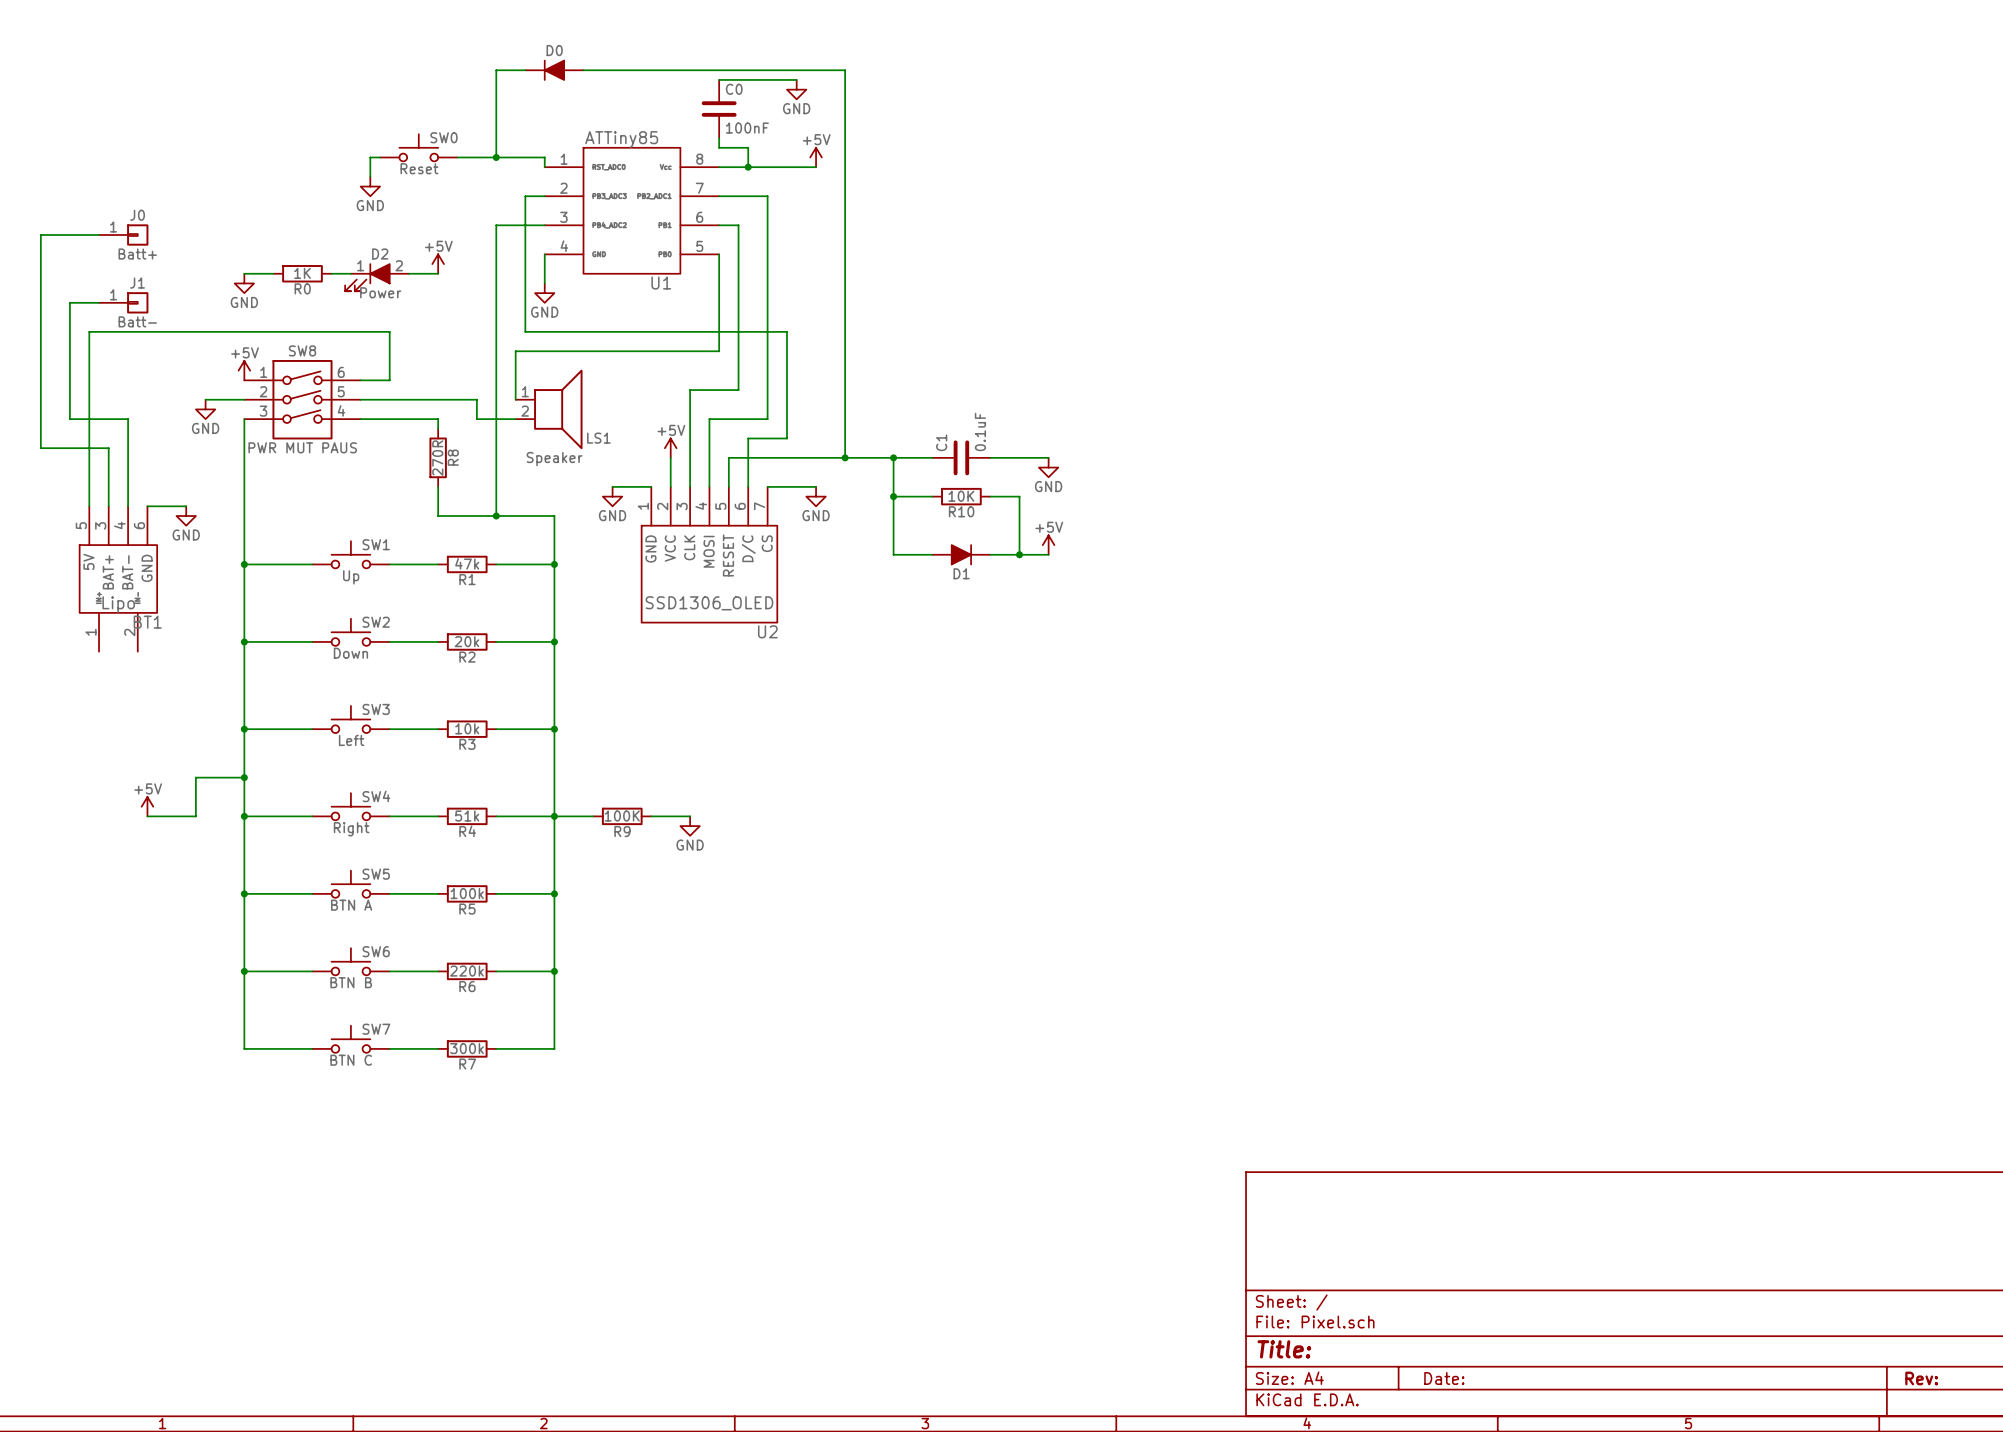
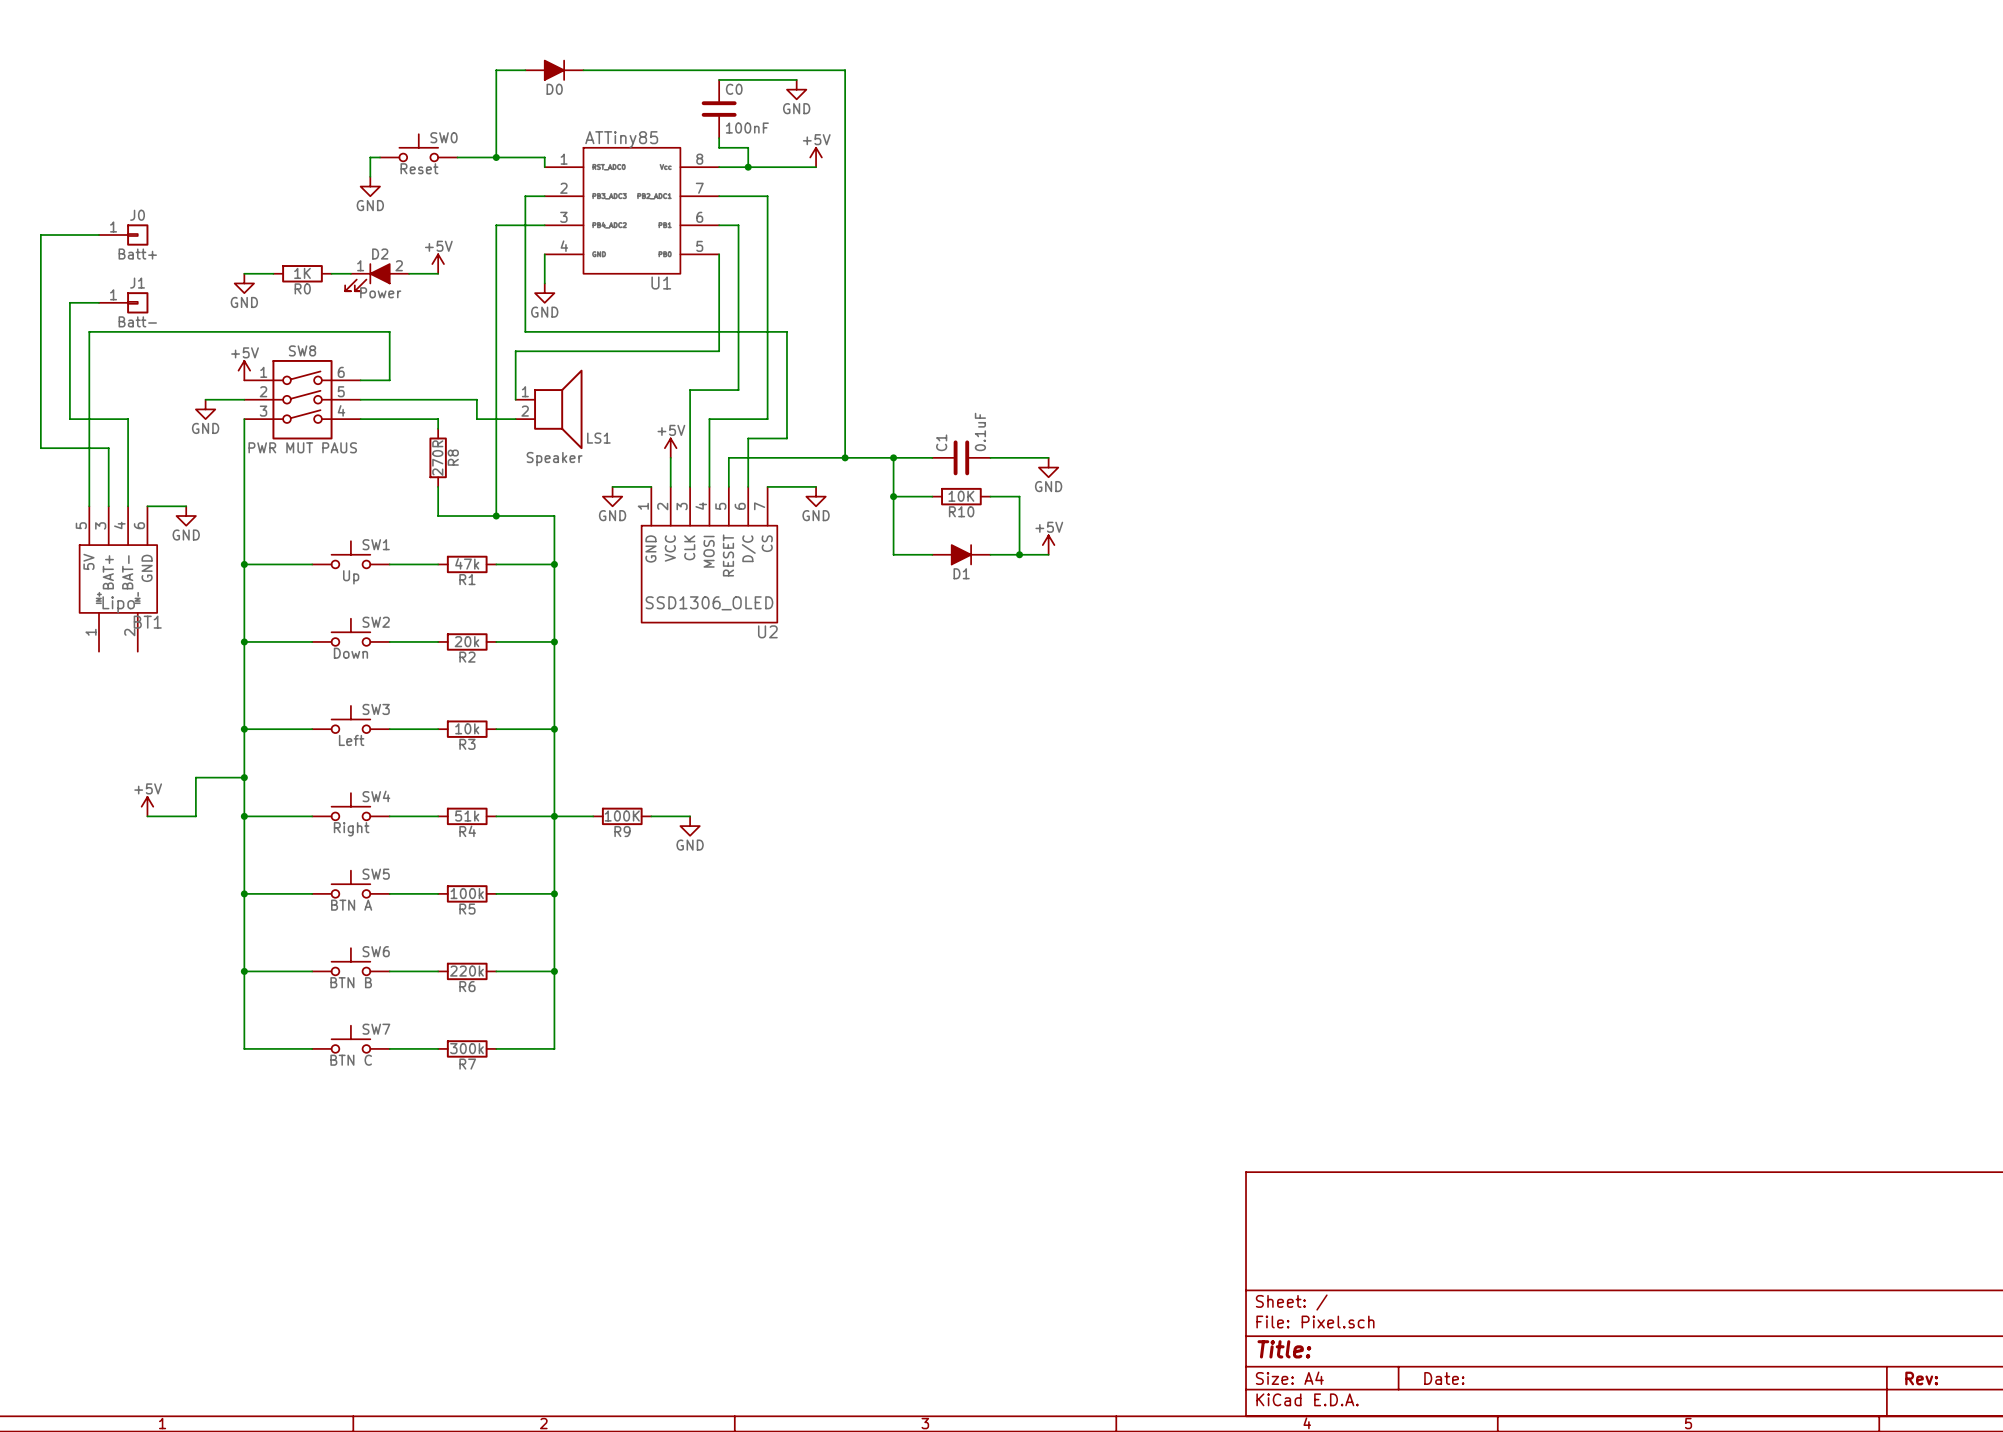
D0 rotation: 0° (554, 70) -> 180° (554, 70)

